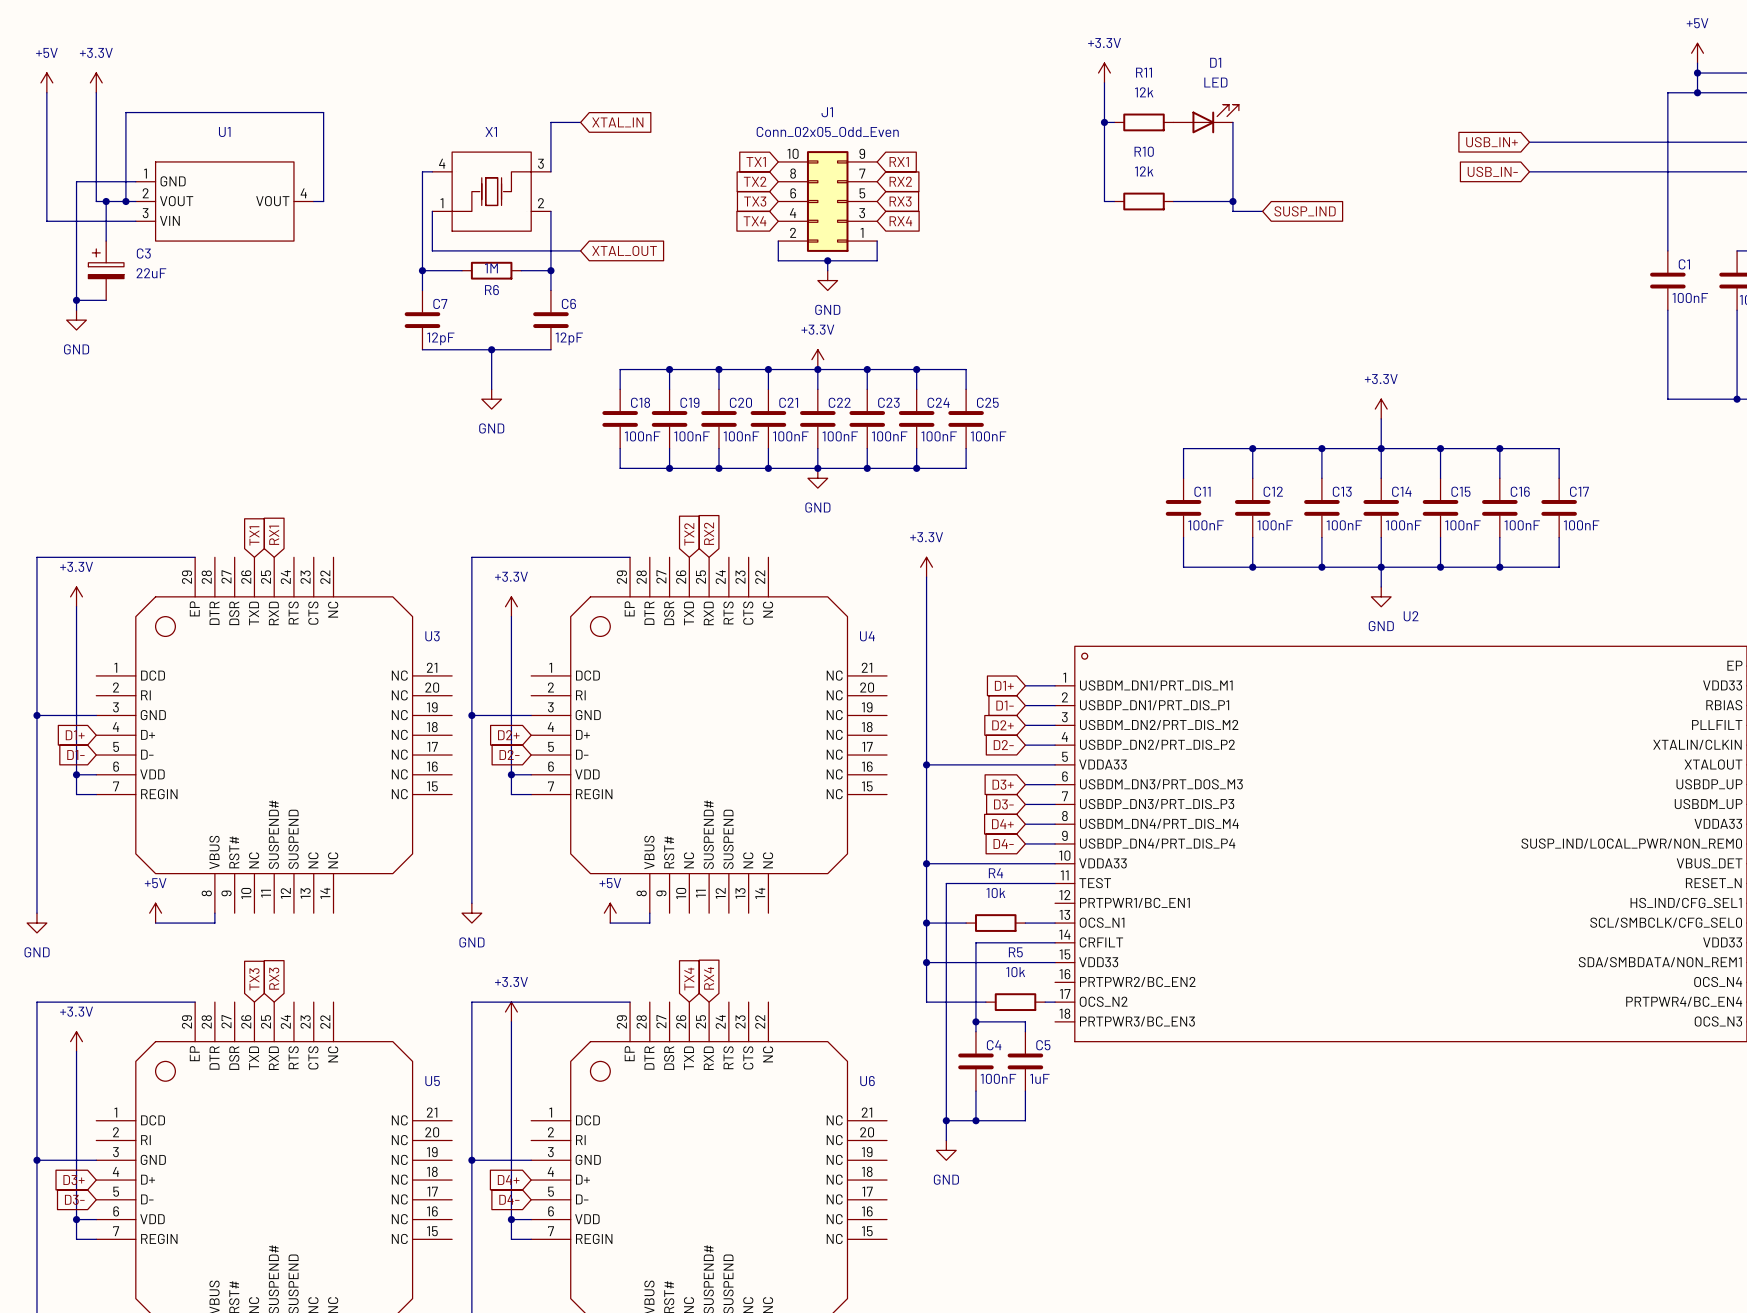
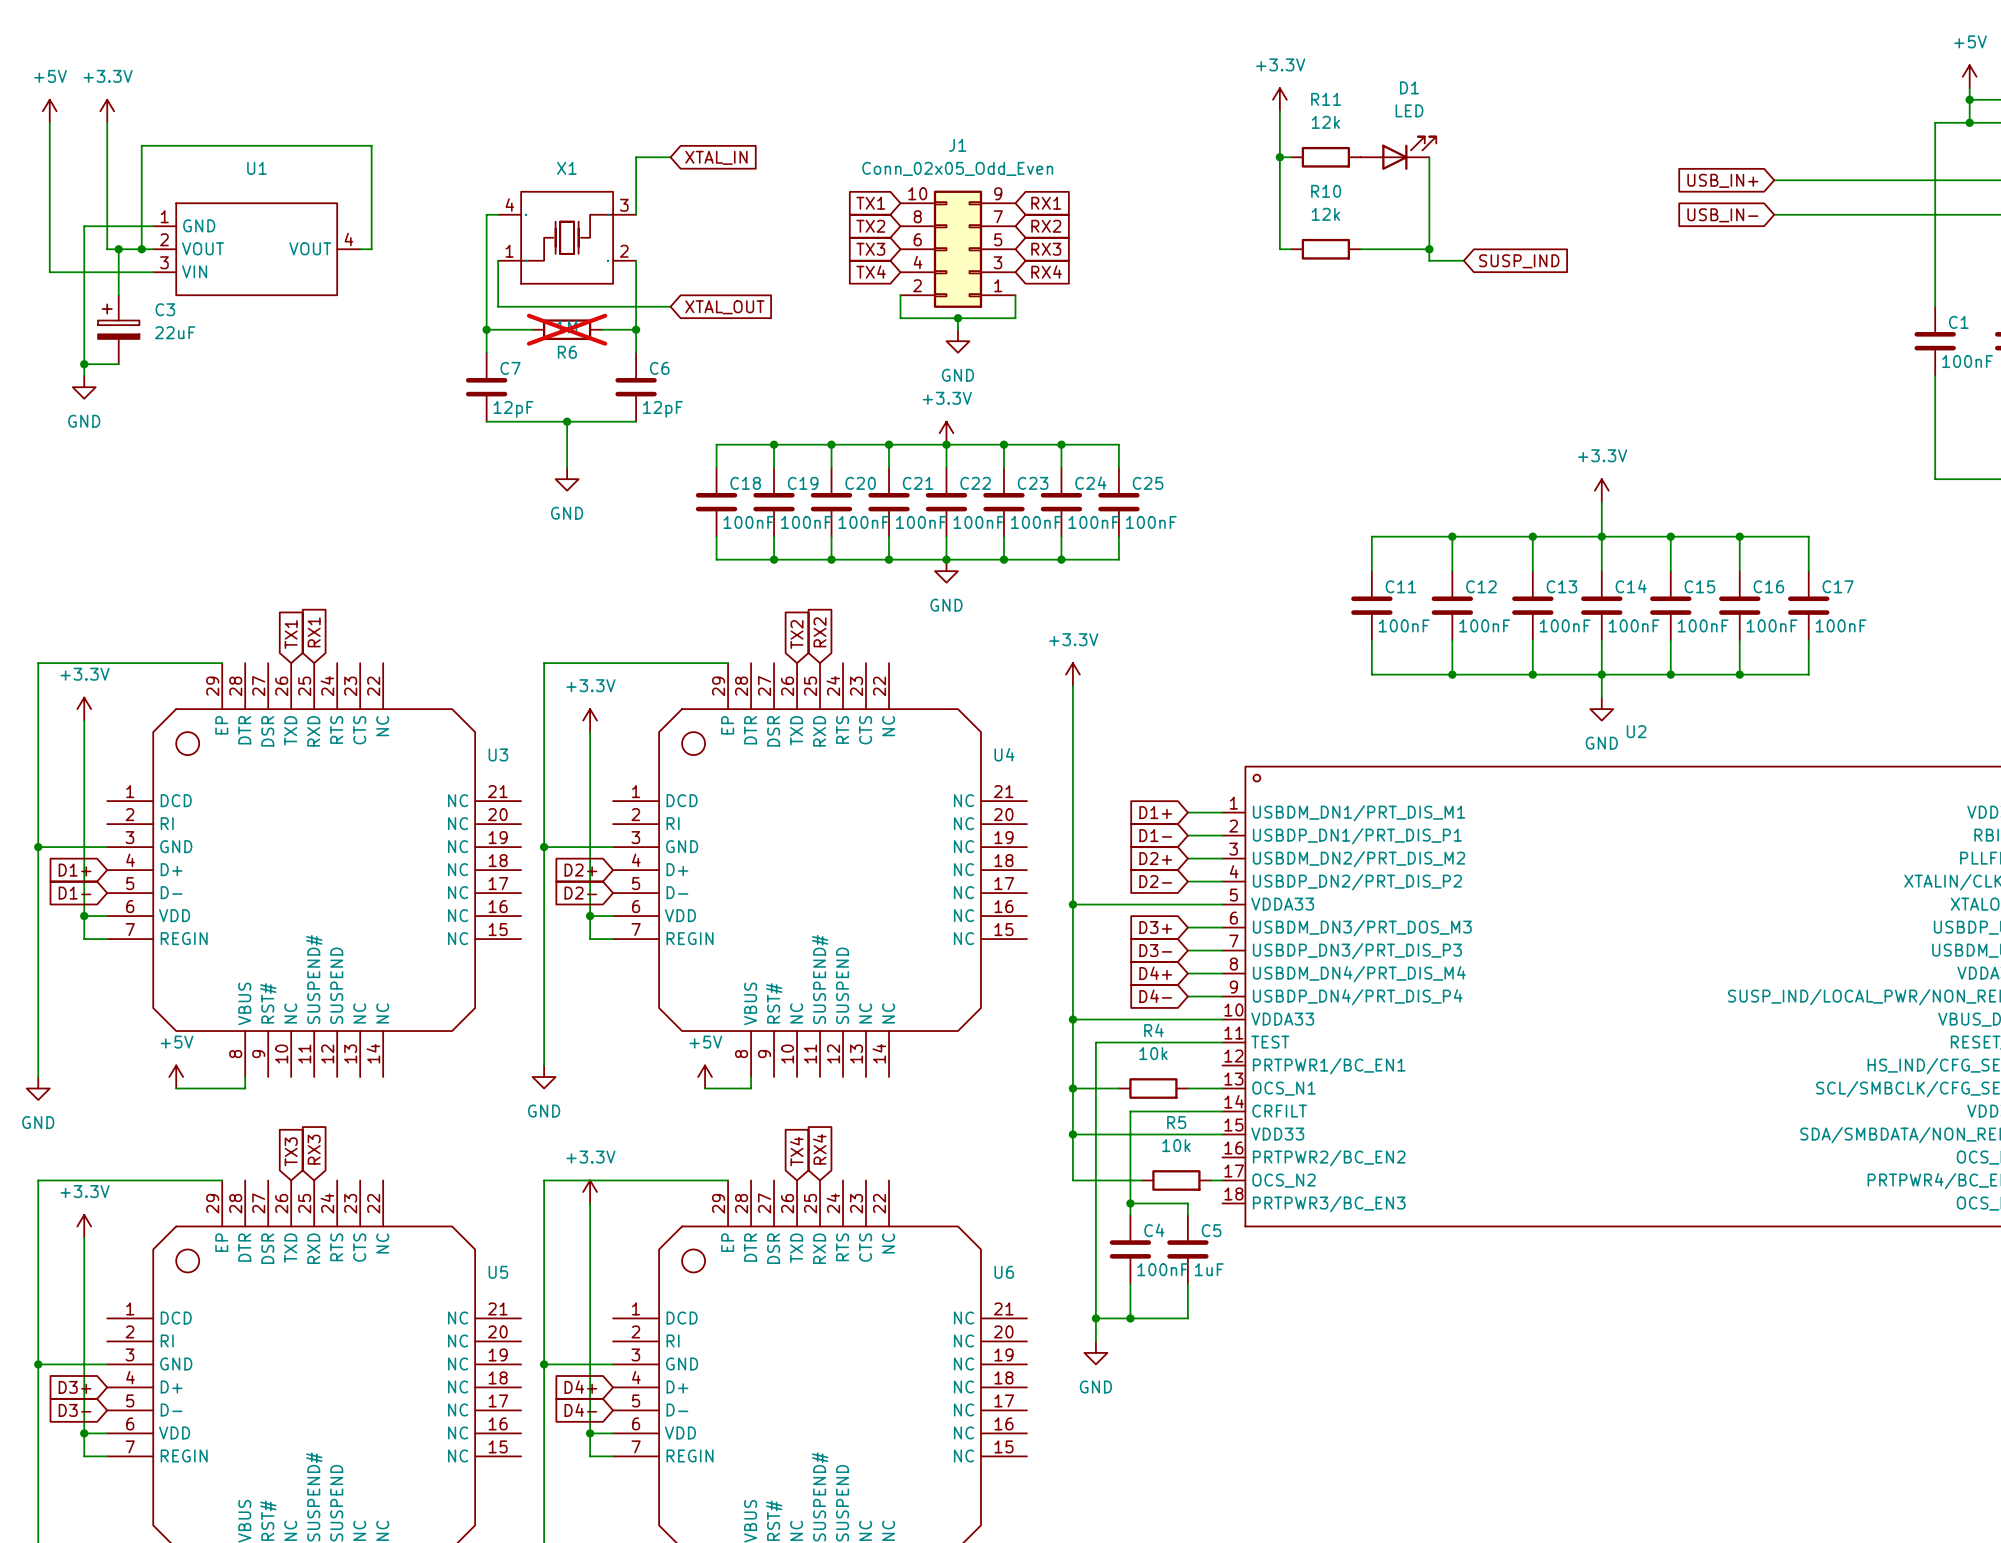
R6 do-not-place cross: none -> (567, 329)

